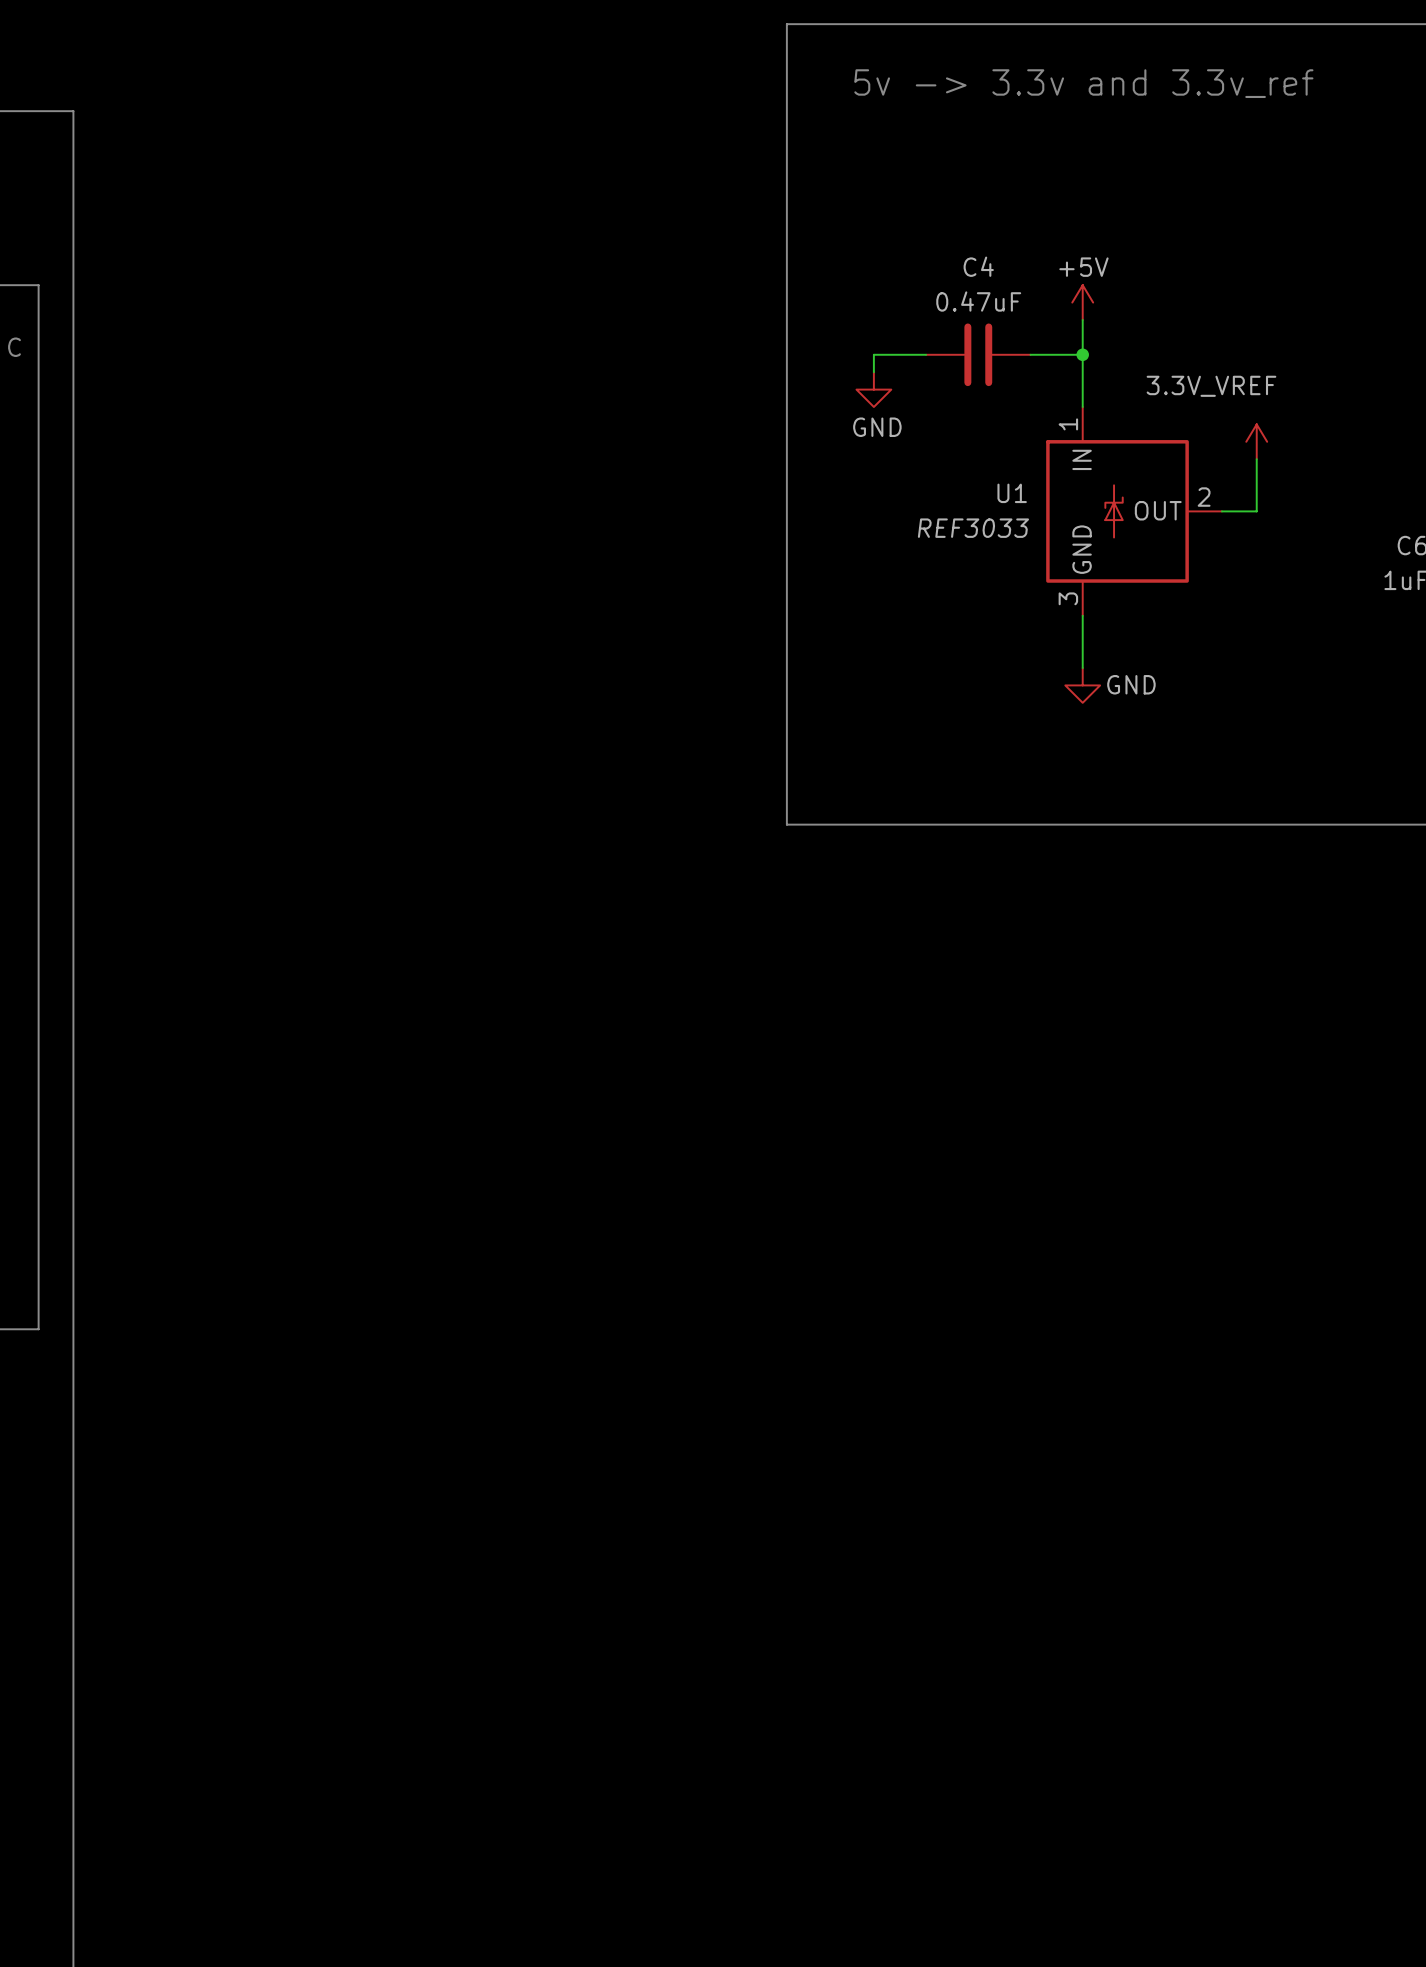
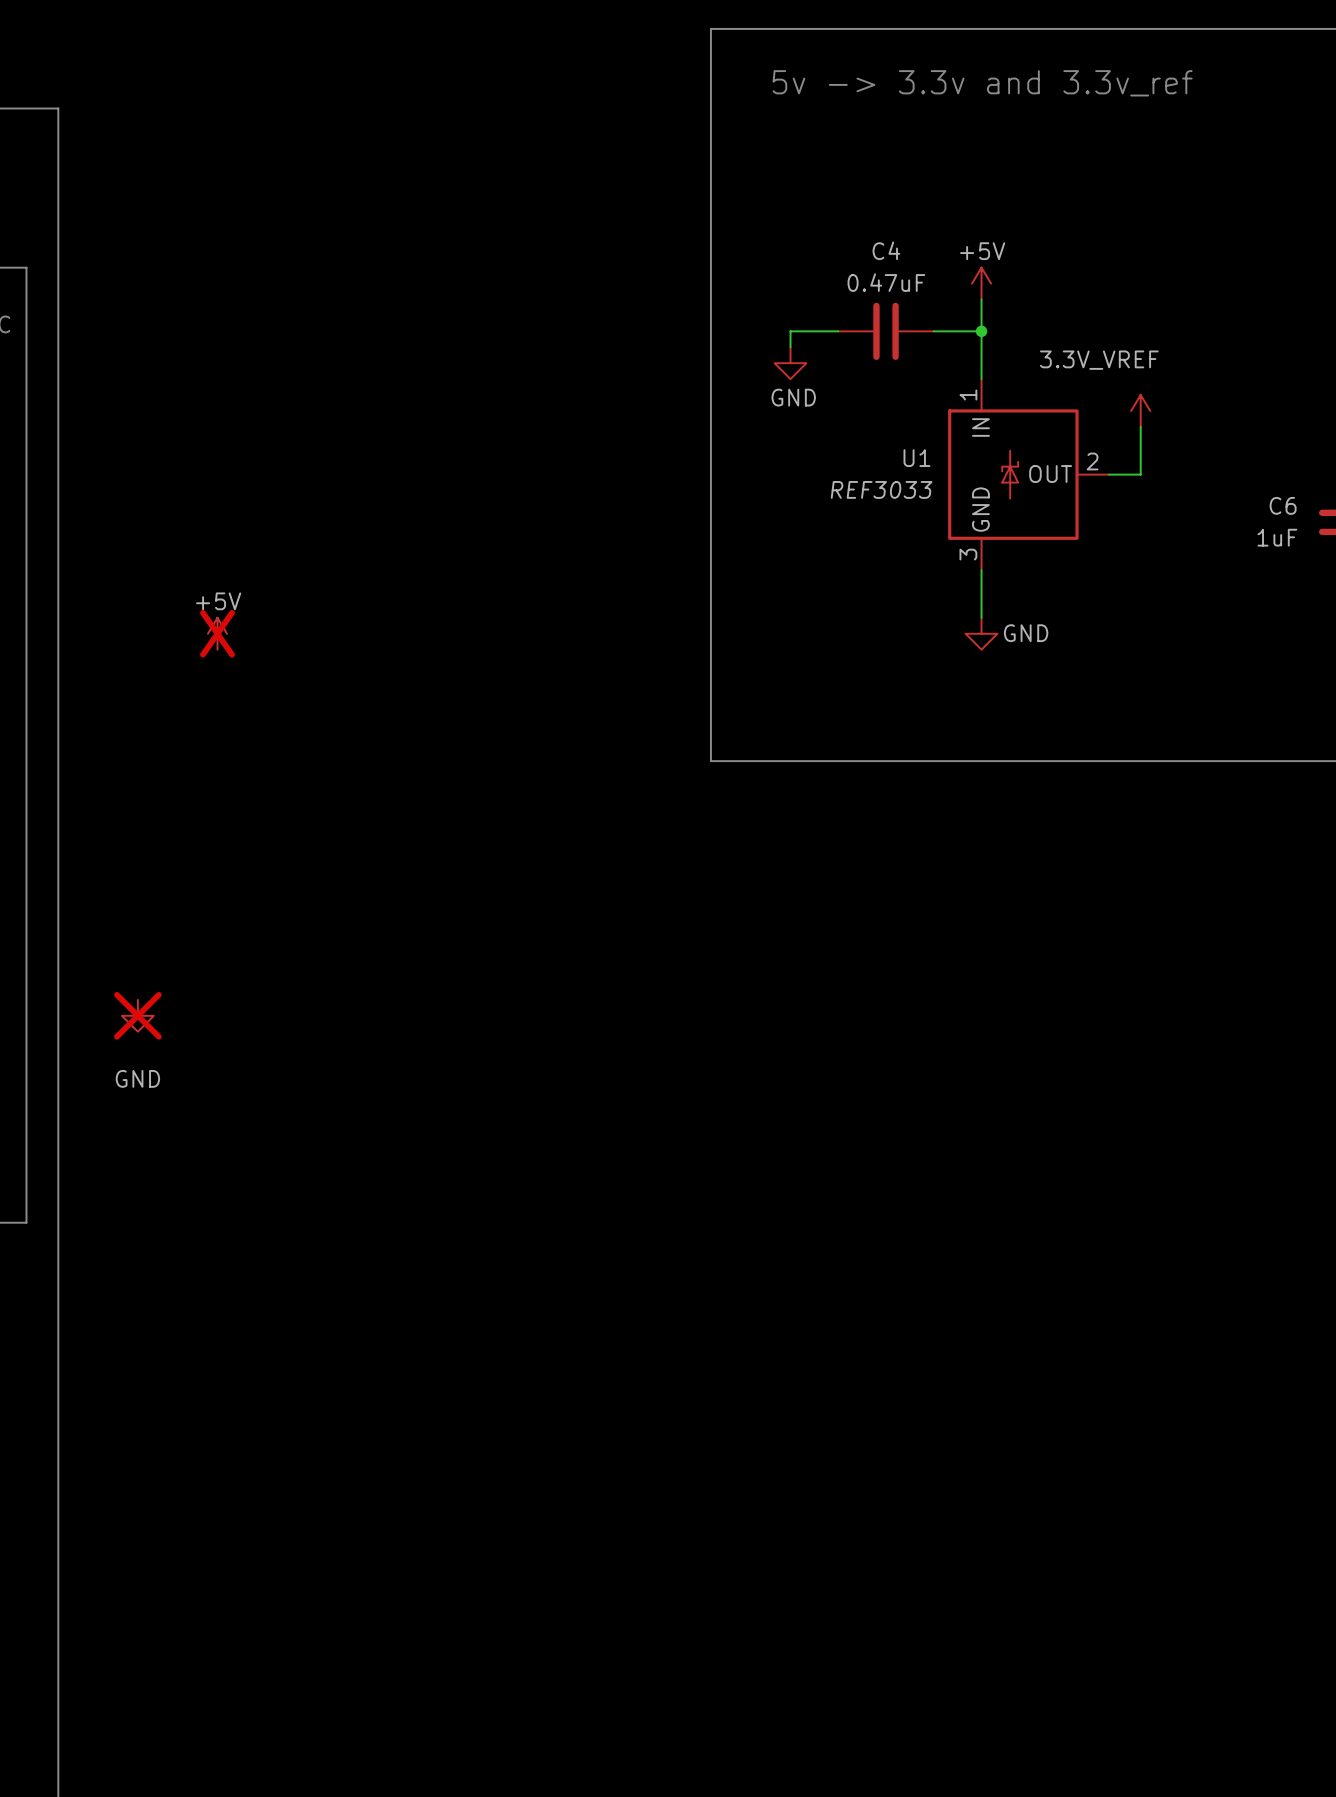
power symbol: none -> +5V (217, 633)
power symbol: none -> GND (137, 1015)

